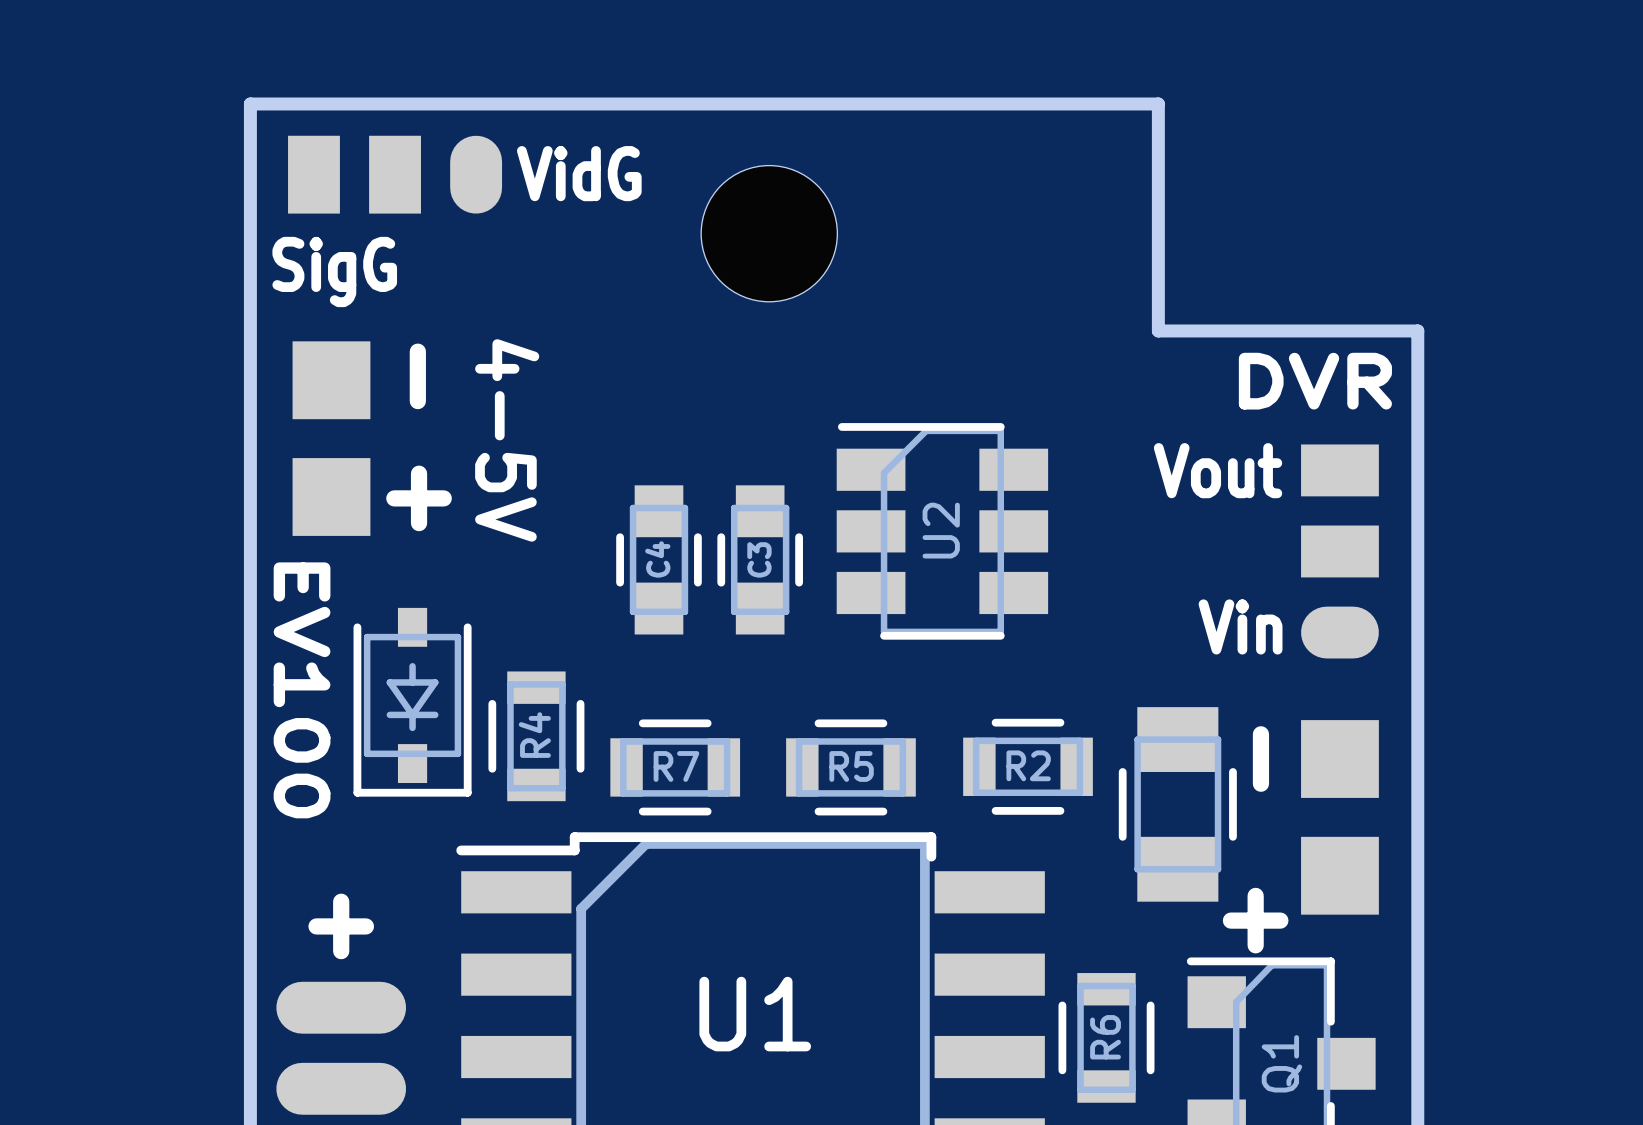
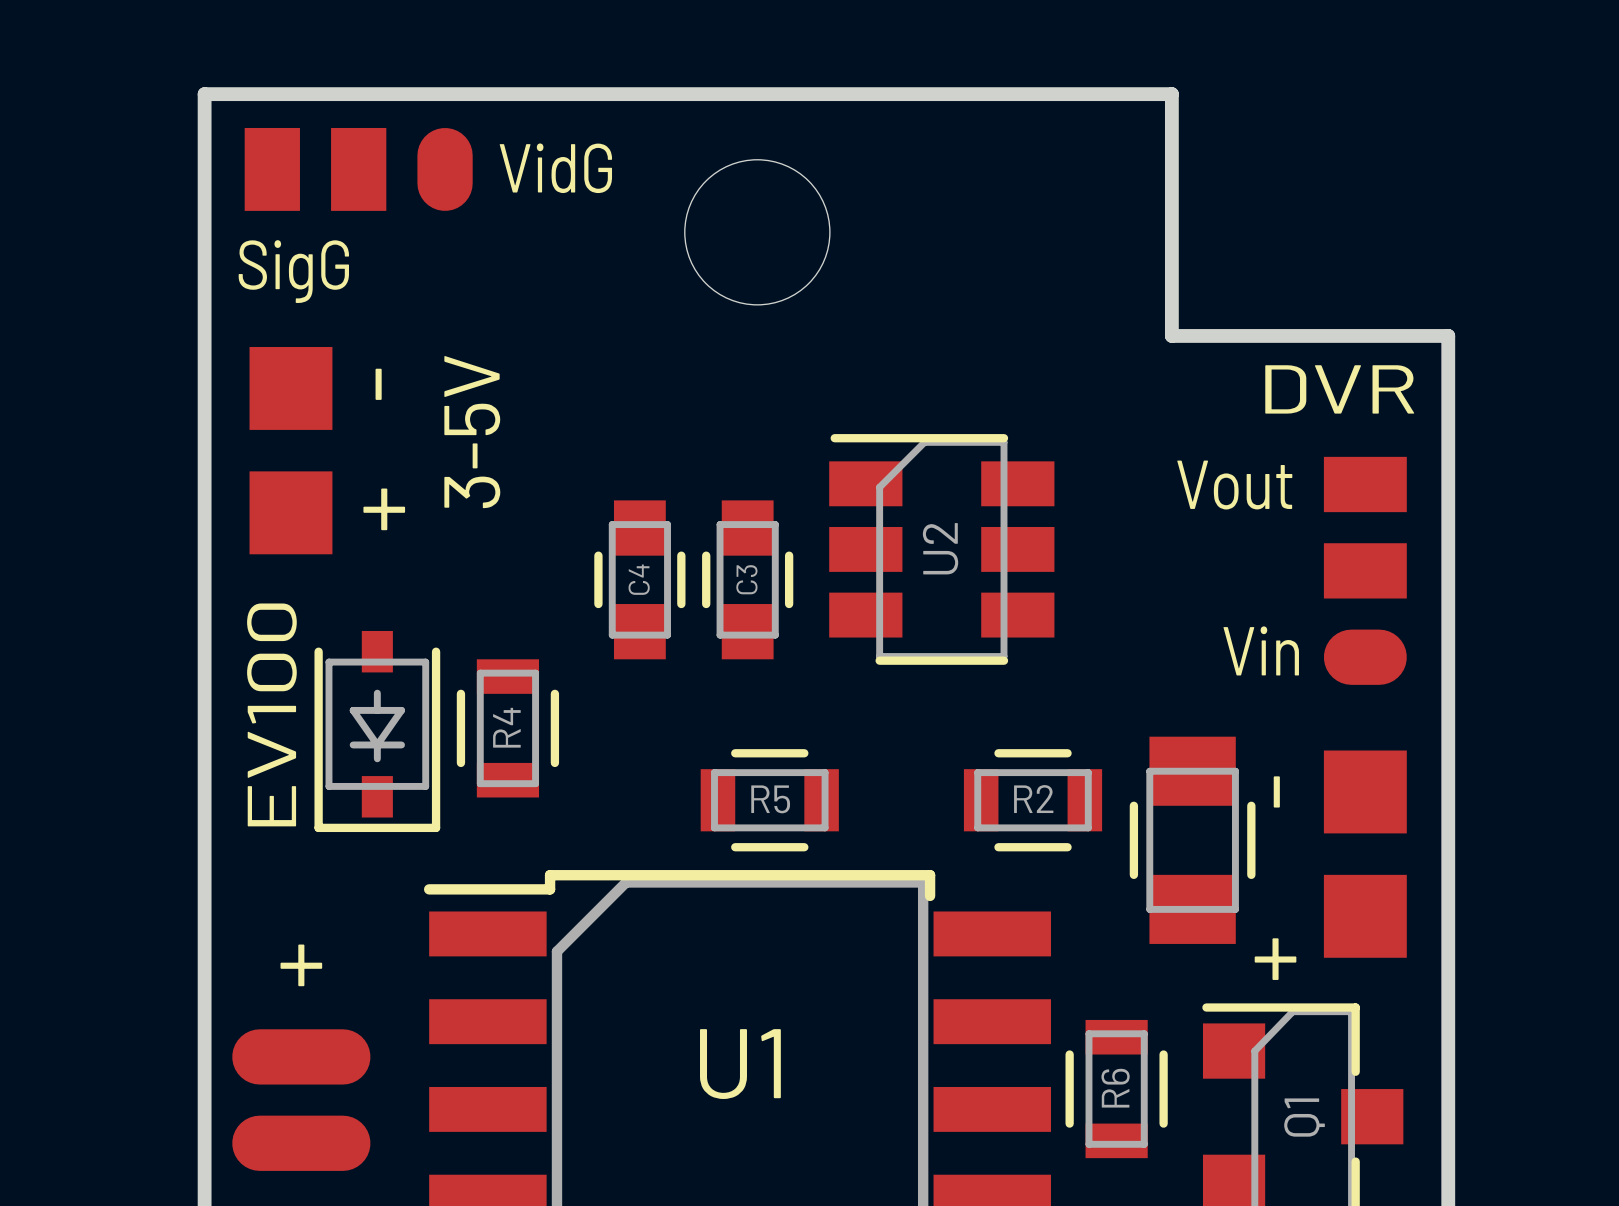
text: 4-5V (507, 440) -> 3-5V (472, 432)
text rotation: 0° (302, 690) -> 180° (271, 714)
R4 position: (536, 736) -> (507, 728)
R7: (675, 767) -> none
R5 position: (850, 767) -> (769, 800)

